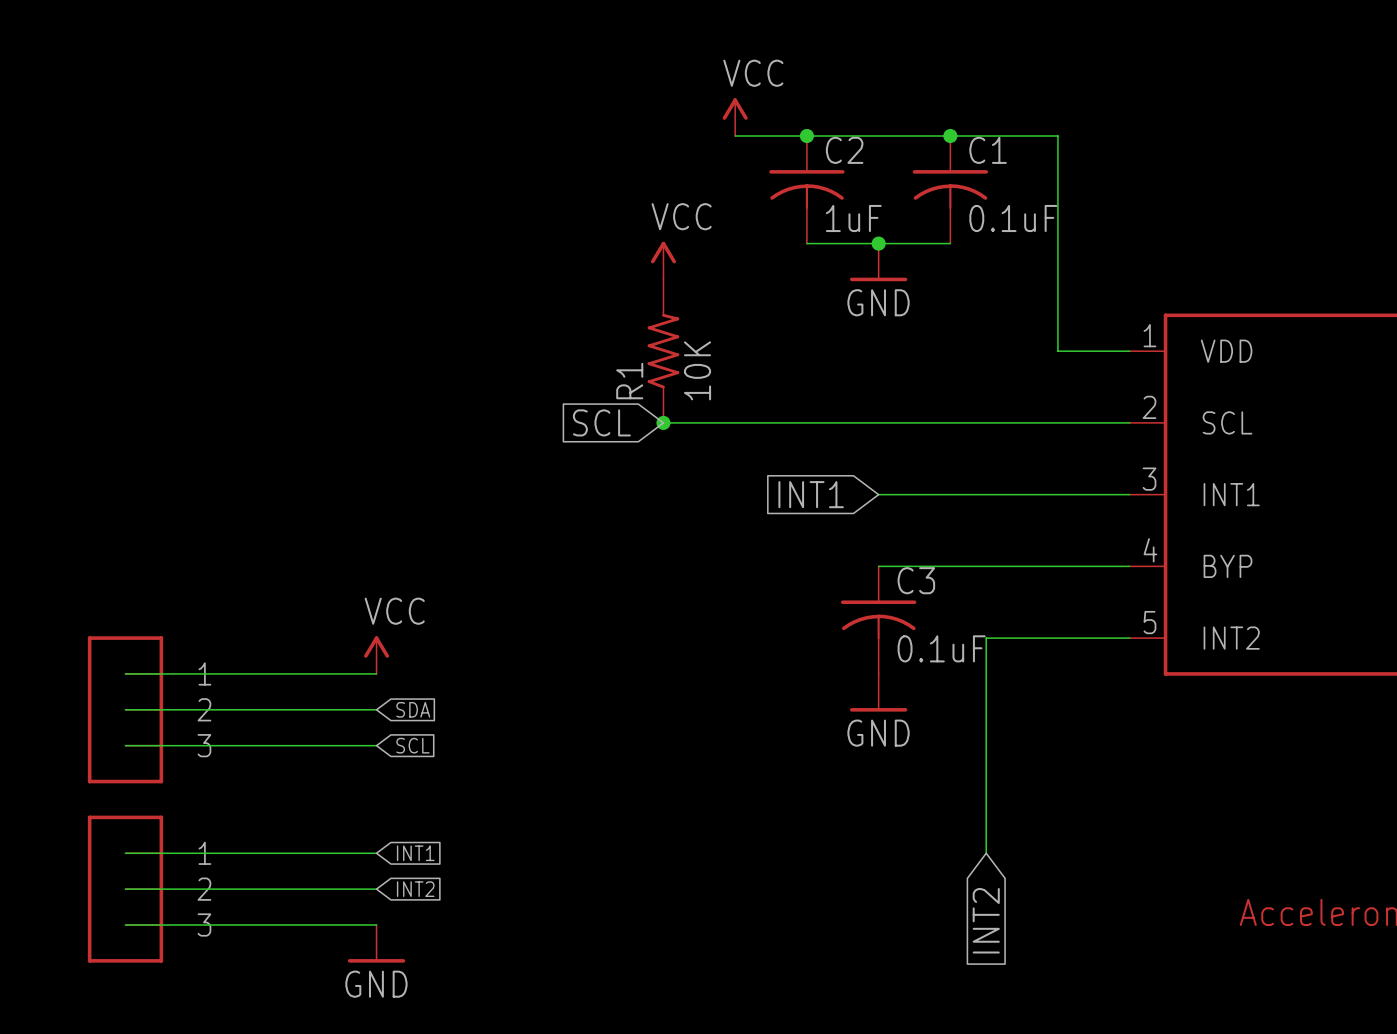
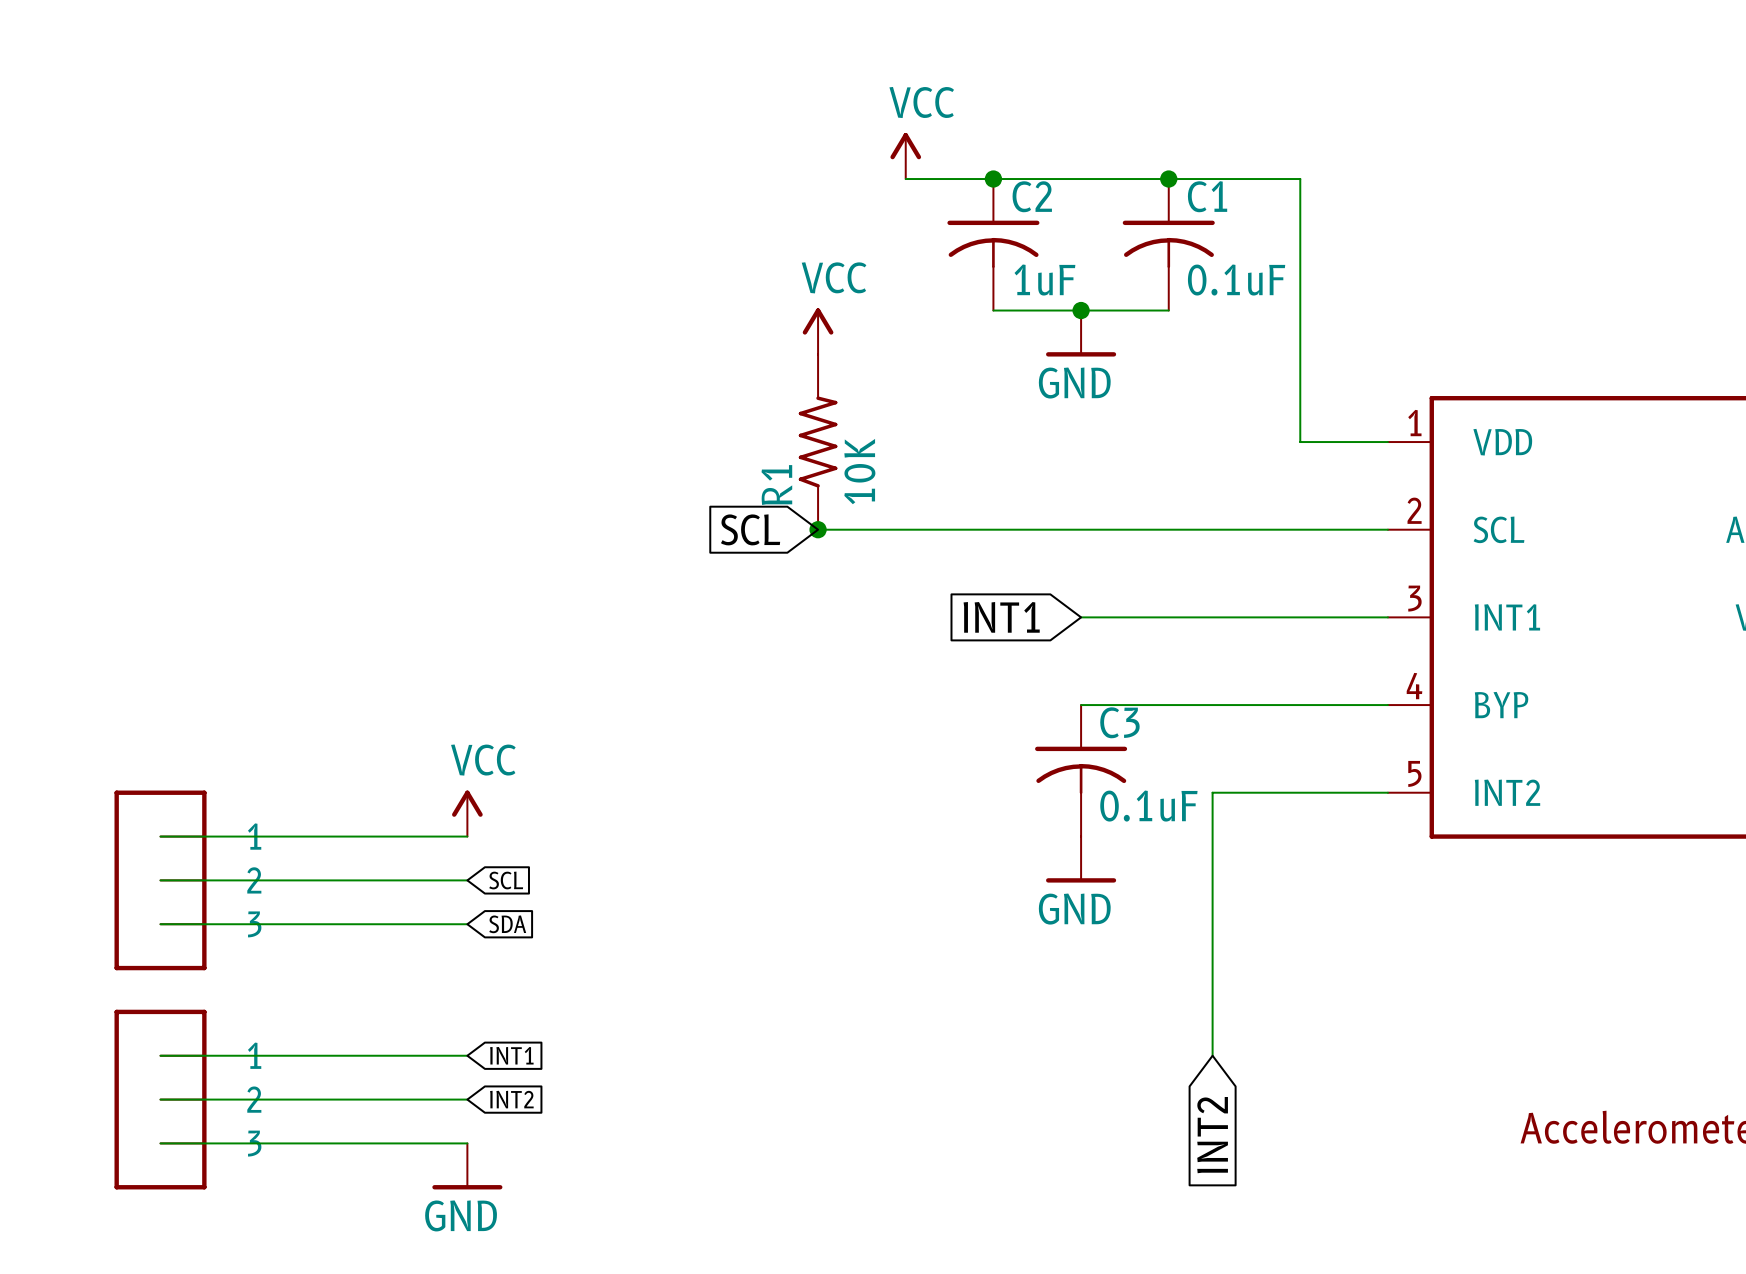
global label: SDA (413, 709) -> SCL (506, 880)
global label: SCL (412, 745) -> SDA (507, 924)

